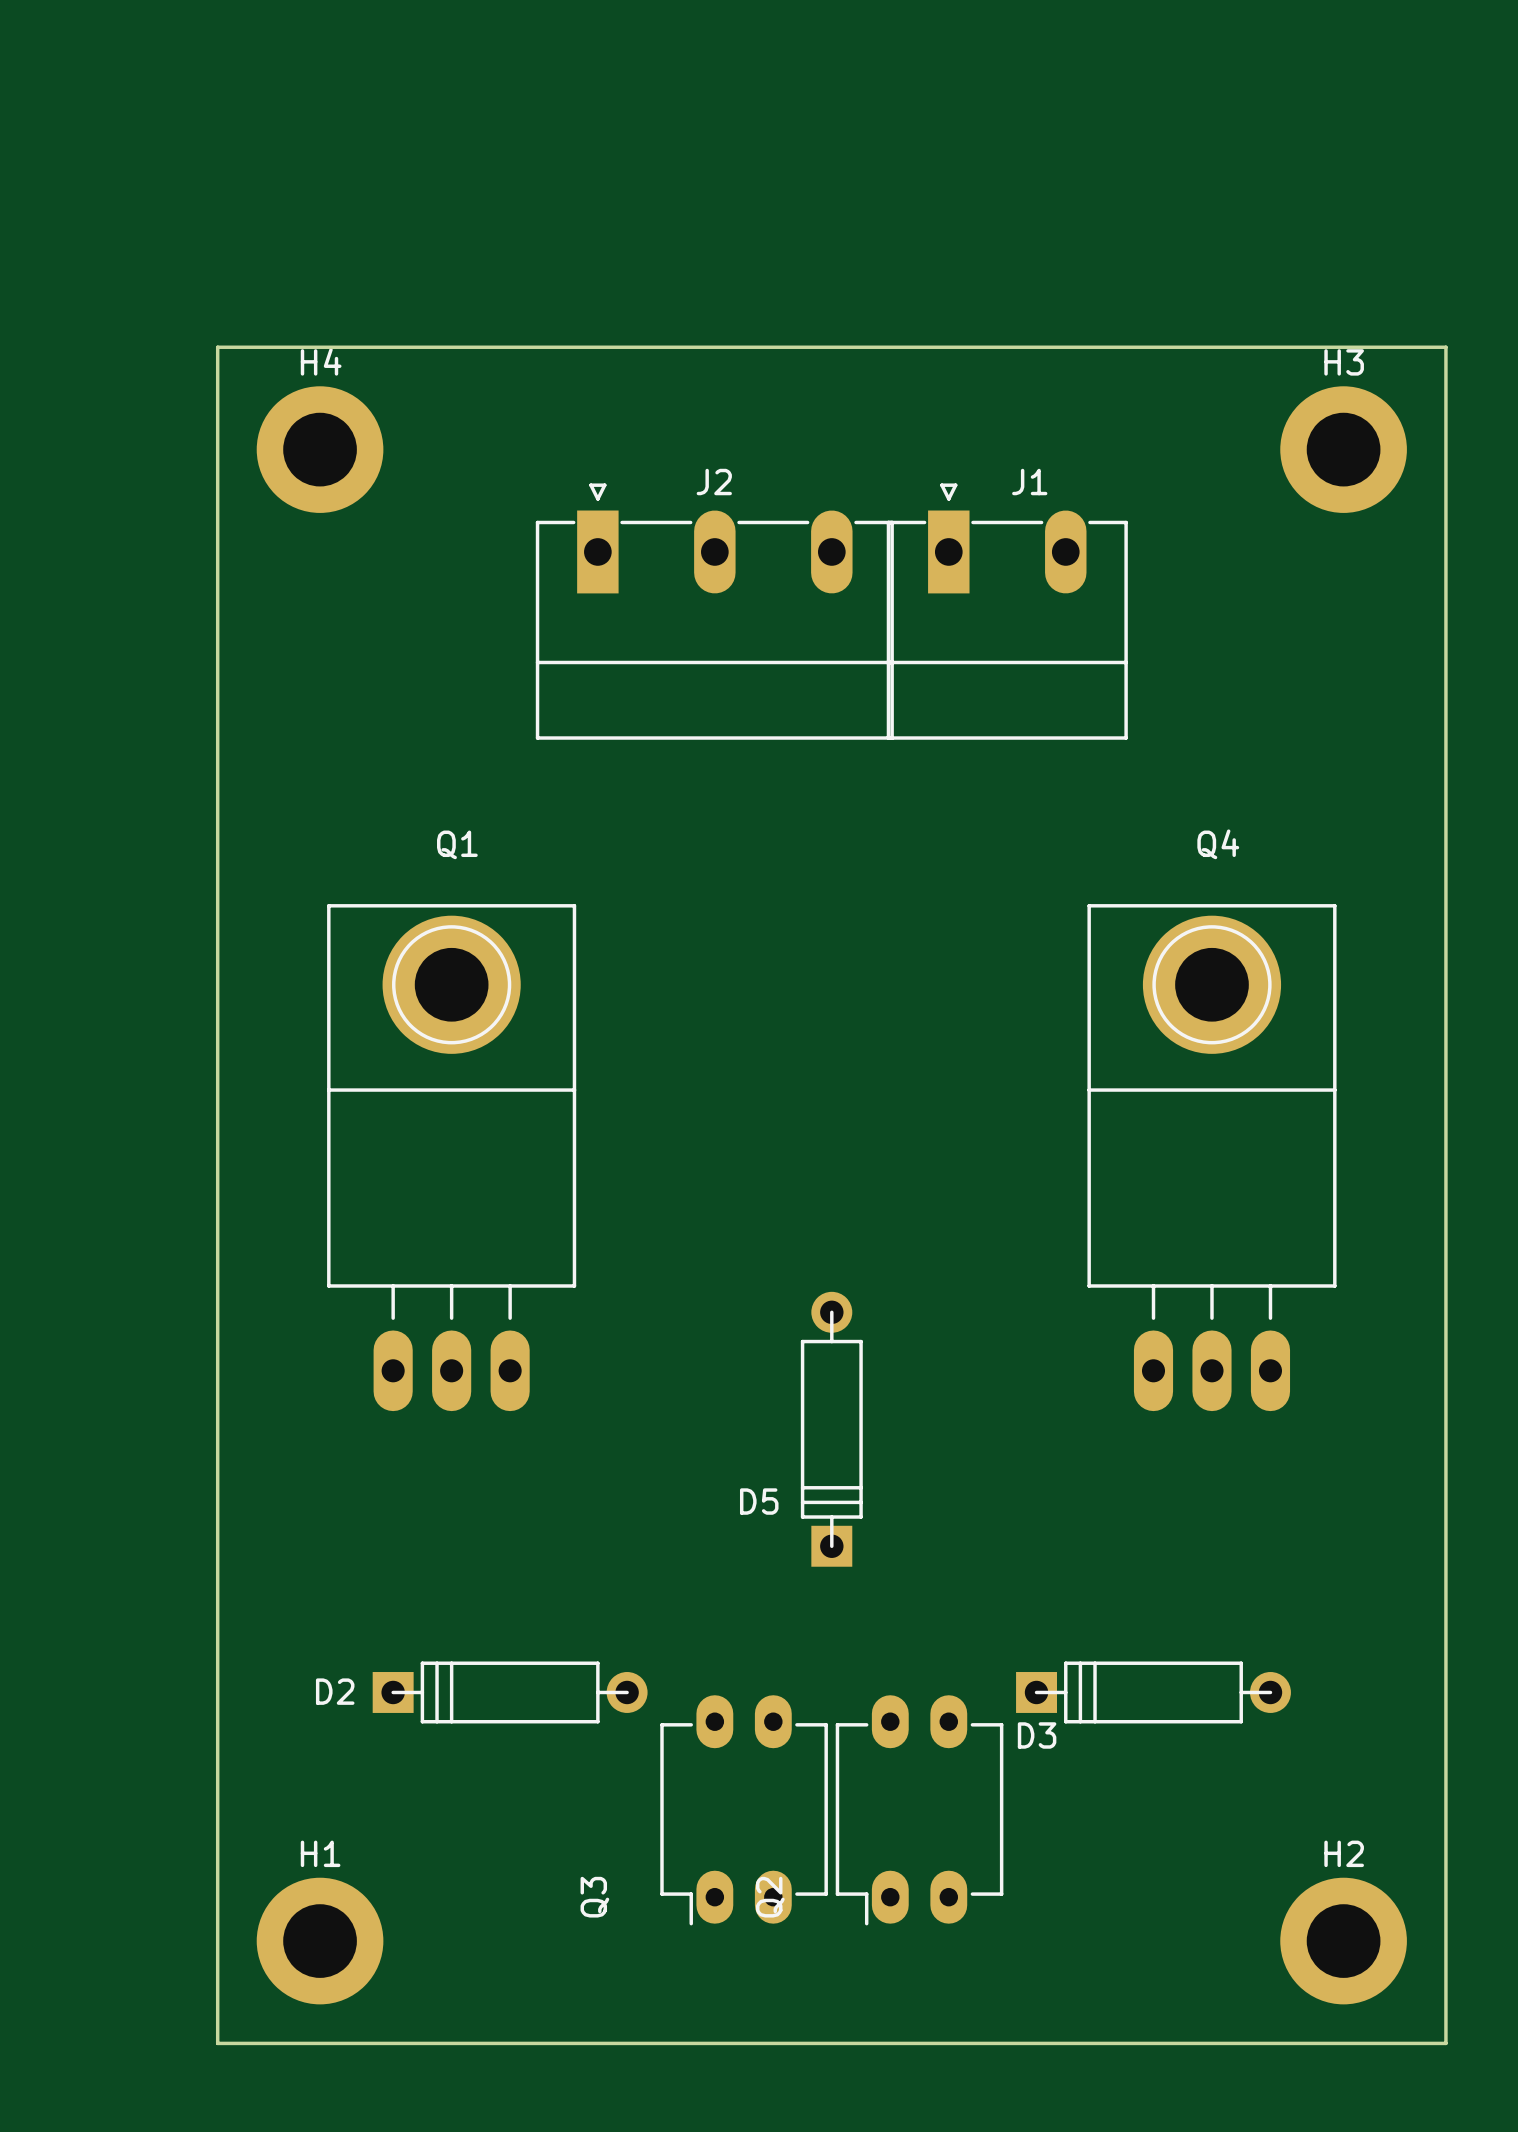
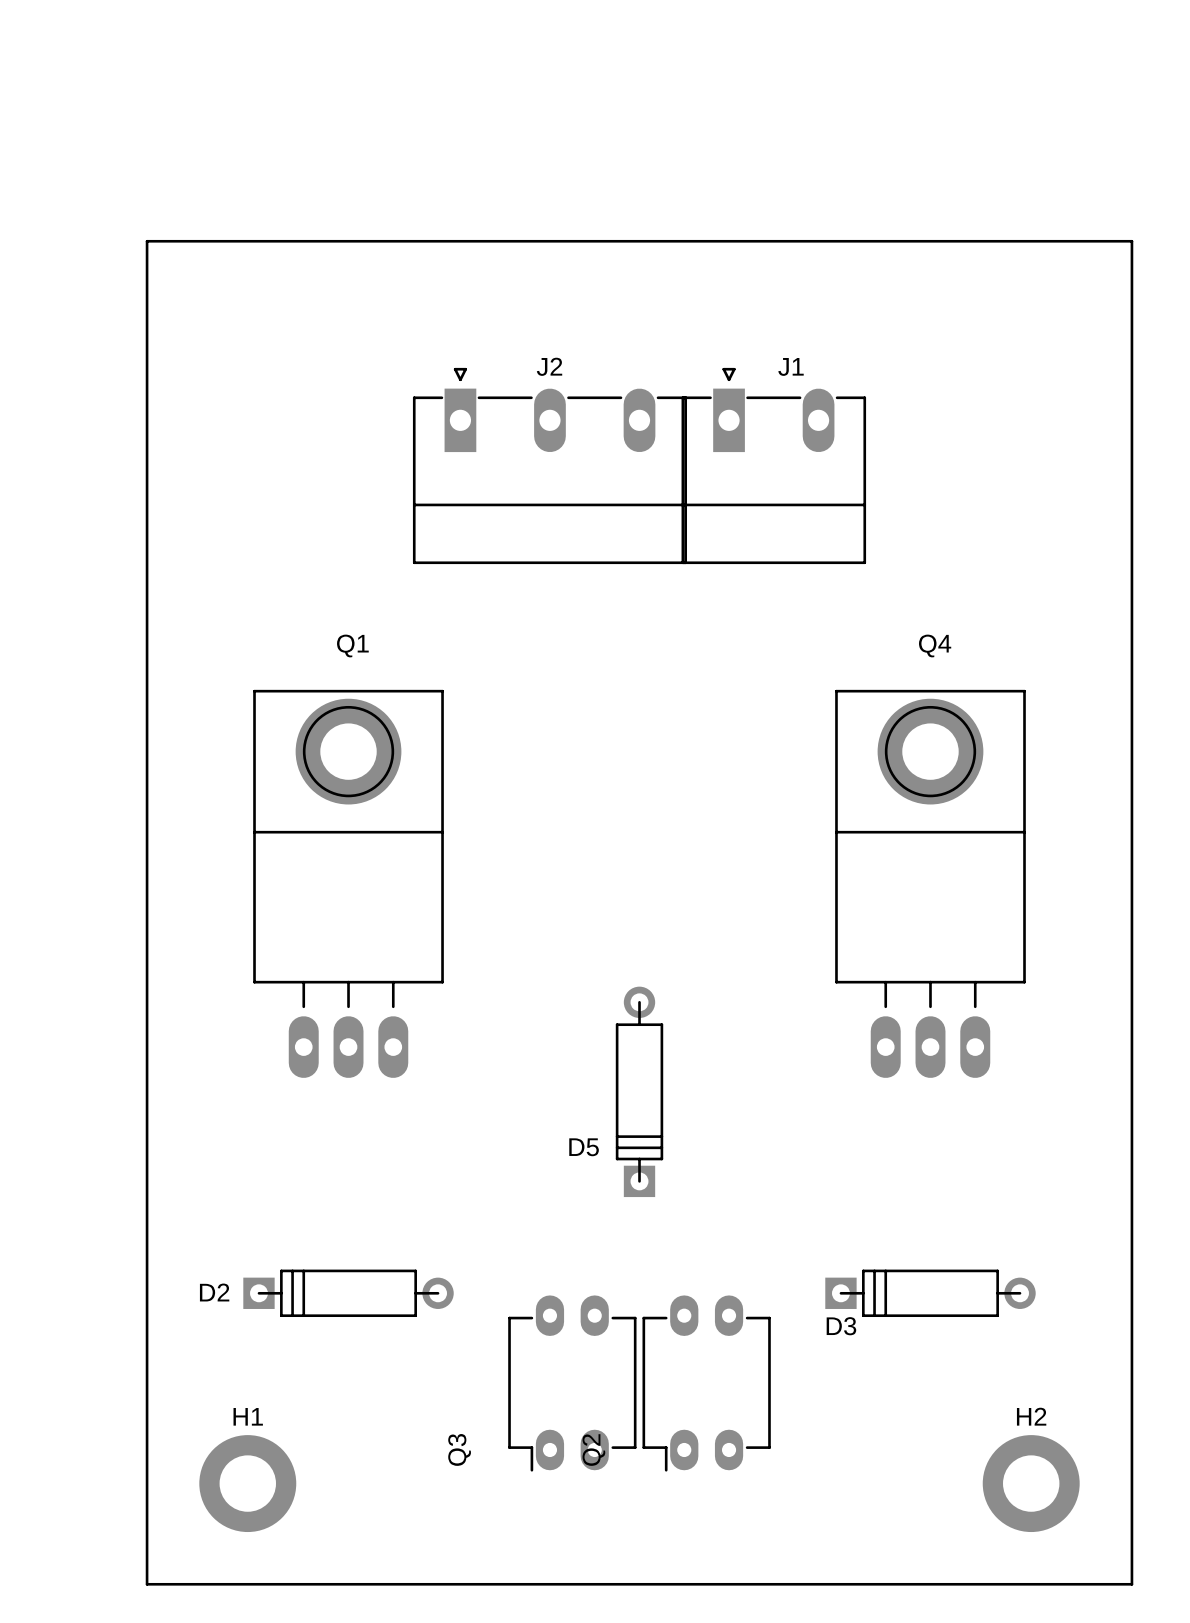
board edge: (217, 347) (217, 2043) (1445, 2043) (1445, 347) (217, 347) -> (147, 241) (147, 1584) (1131, 1584) (1131, 241) (147, 241)
H4: (320, 449) -> none
H3: (1343, 449) -> none
D2 position: (510, 1692) -> (348, 1293)
D3 position: (1153, 1692) -> (930, 1293)

